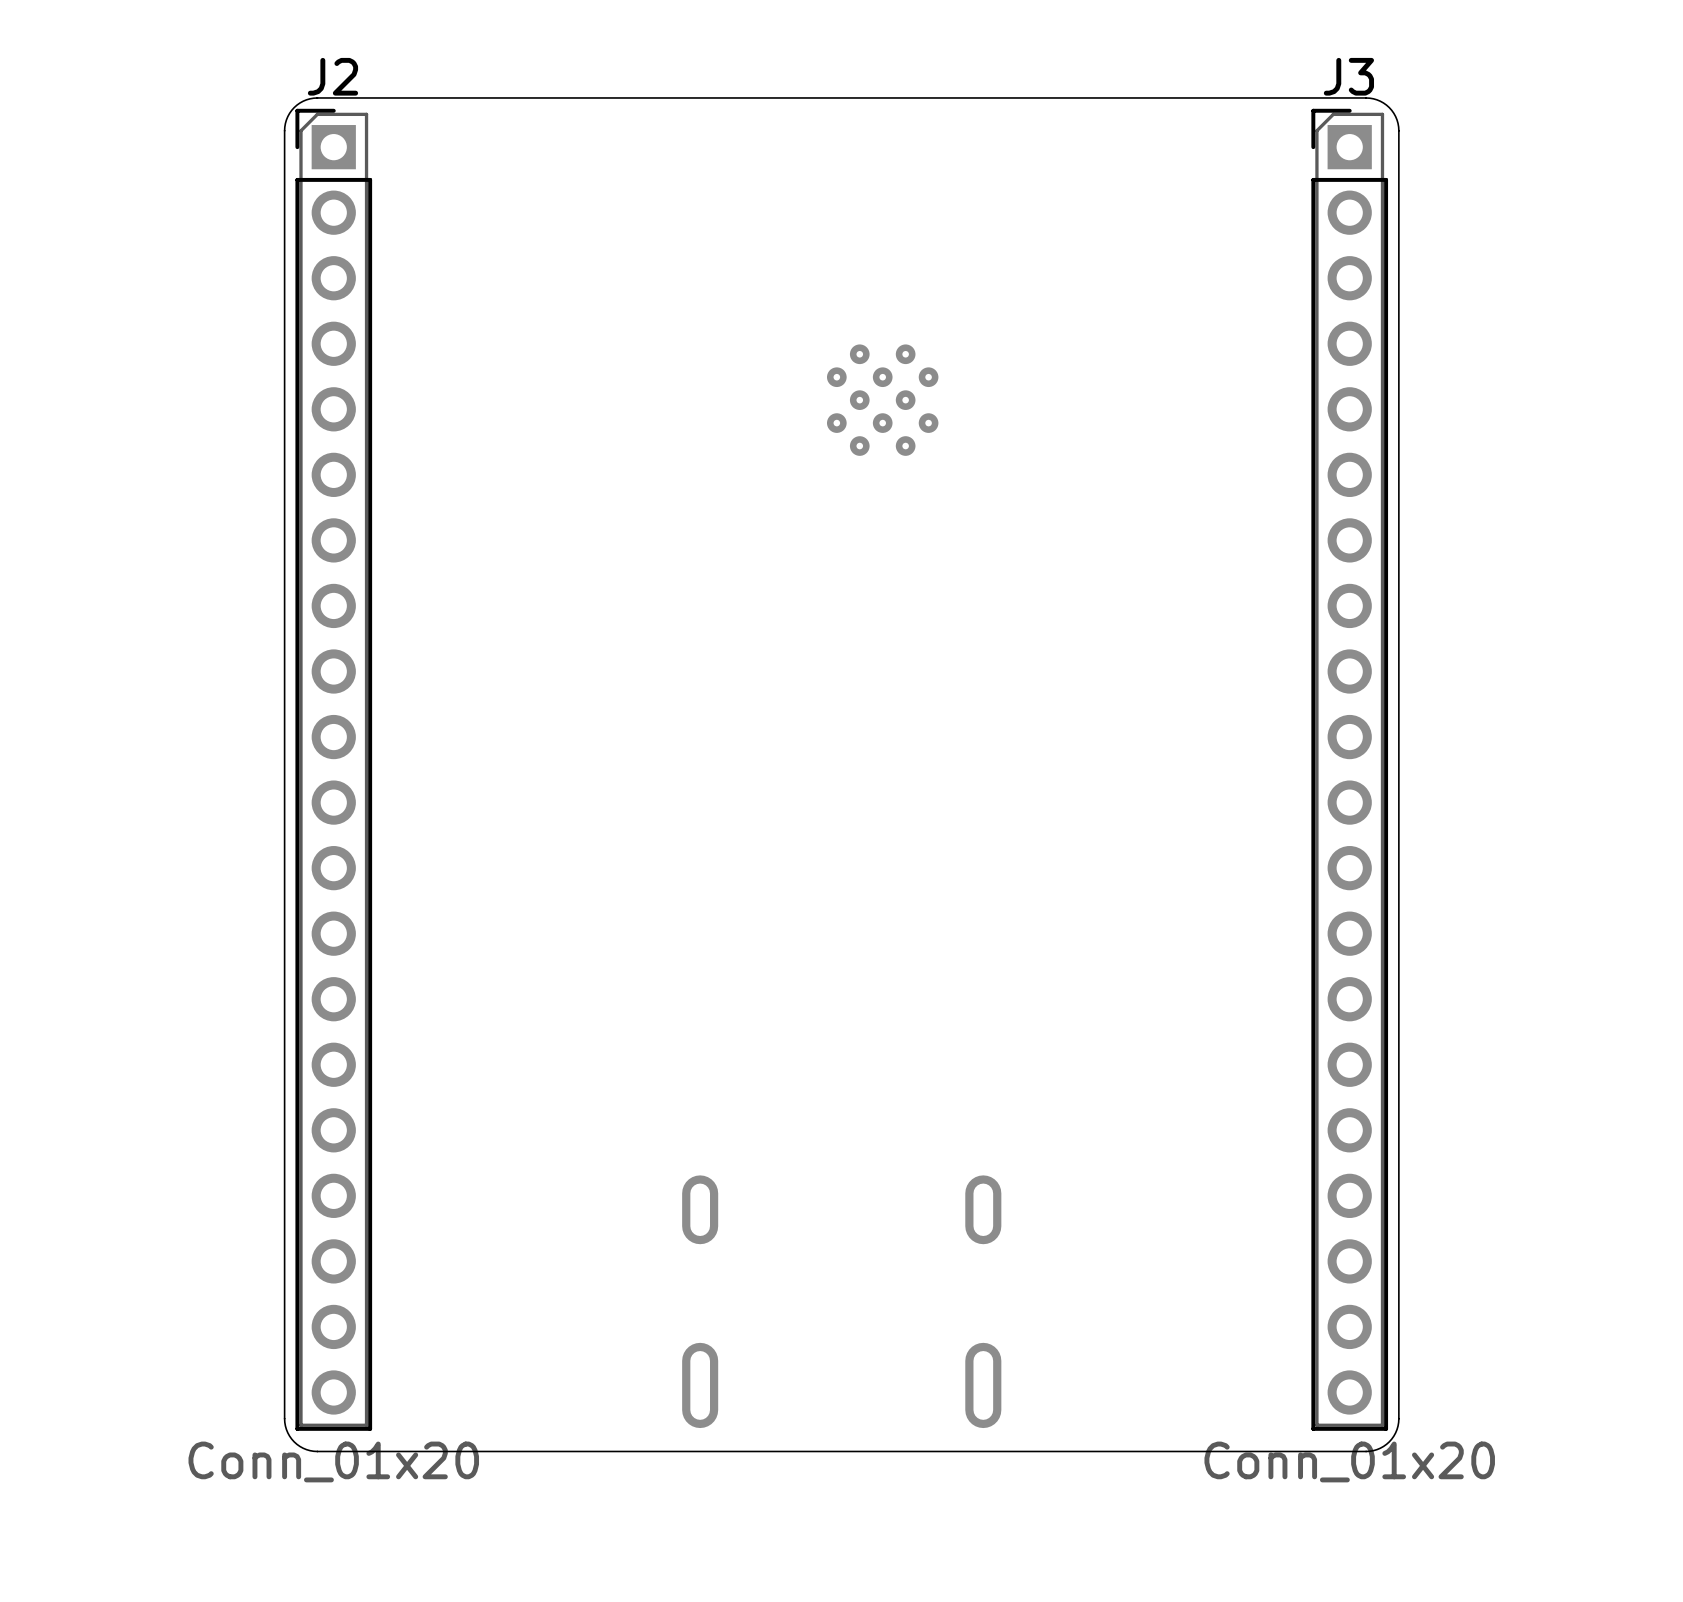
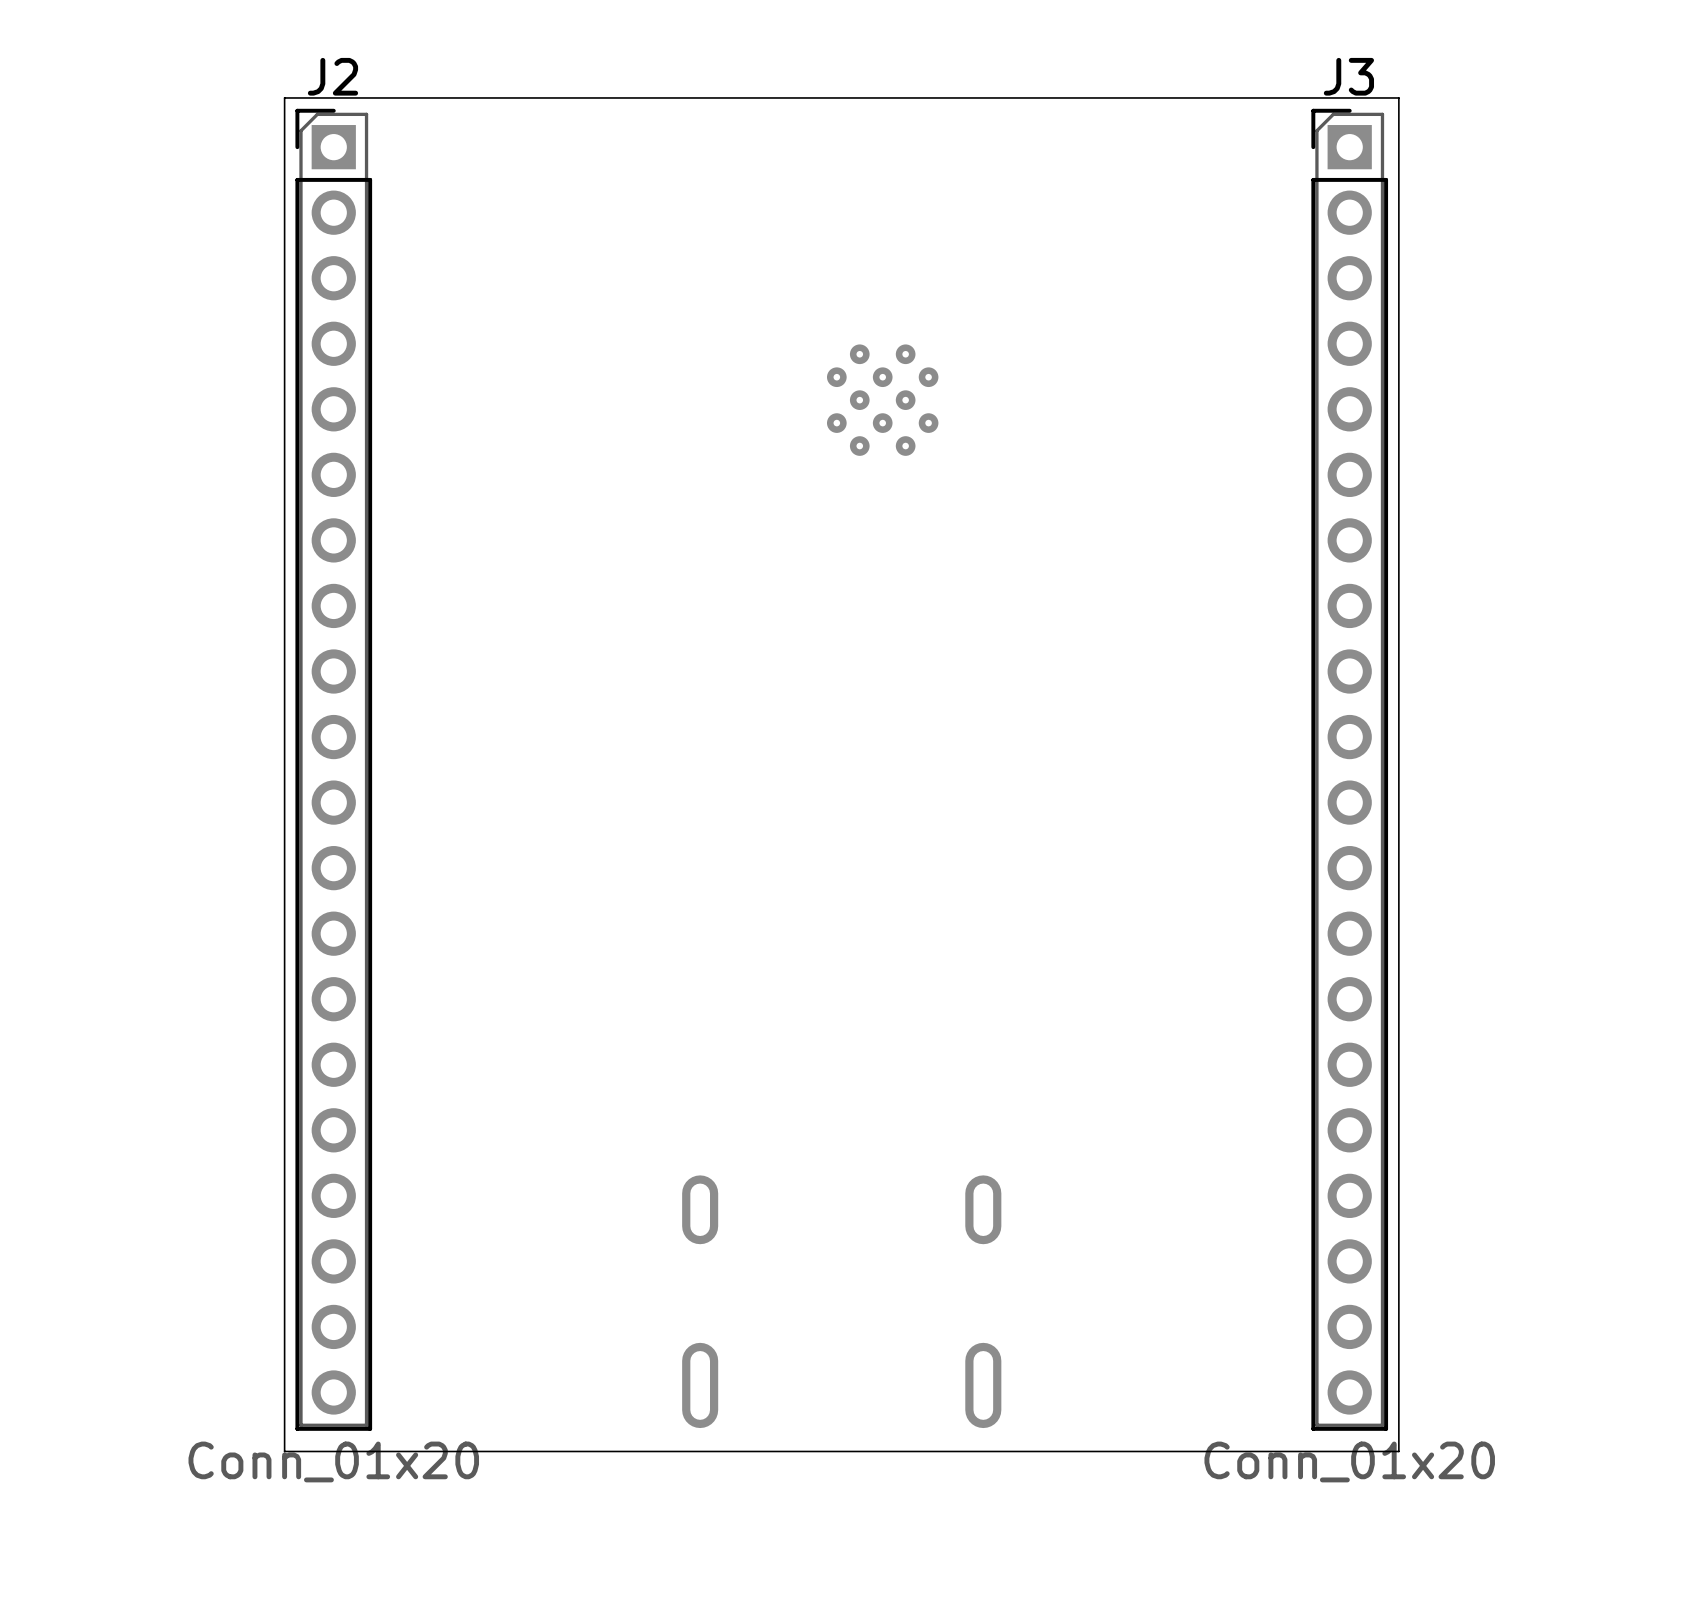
board edge: (317, 97) (306, 99) (294, 107) (286, 119) (284, 130) -> (317, 97) (284, 97) (284, 130)
board edge: (1366, 97) (1376, 99) (1389, 107) (1397, 119) (1398, 130) -> (1366, 97) (1398, 97) (1398, 130)
board edge: (284, 1418) (286, 1429) (294, 1441) (306, 1449) (317, 1451) -> (284, 1418) (284, 1451) (317, 1451)
board edge: (1398, 1418) (1397, 1429) (1389, 1441) (1380, 1448) (1366, 1451) -> (1398, 1418) (1398, 1451) (1366, 1451)

